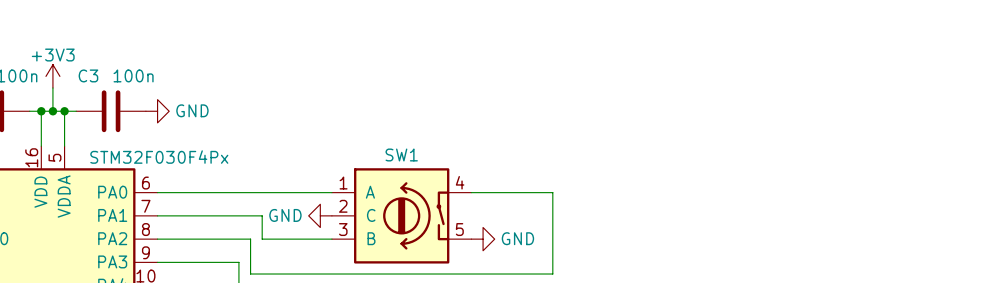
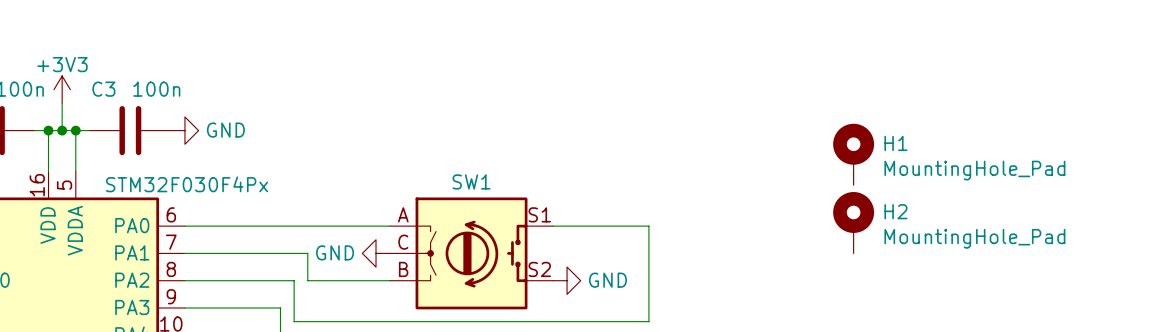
H1: none -> MountingHole_Pad (853, 154)
SW1 symbol: [331, 168, 472, 264] -> [389, 197, 554, 310]
H2: none -> MountingHole_Pad (853, 222)

